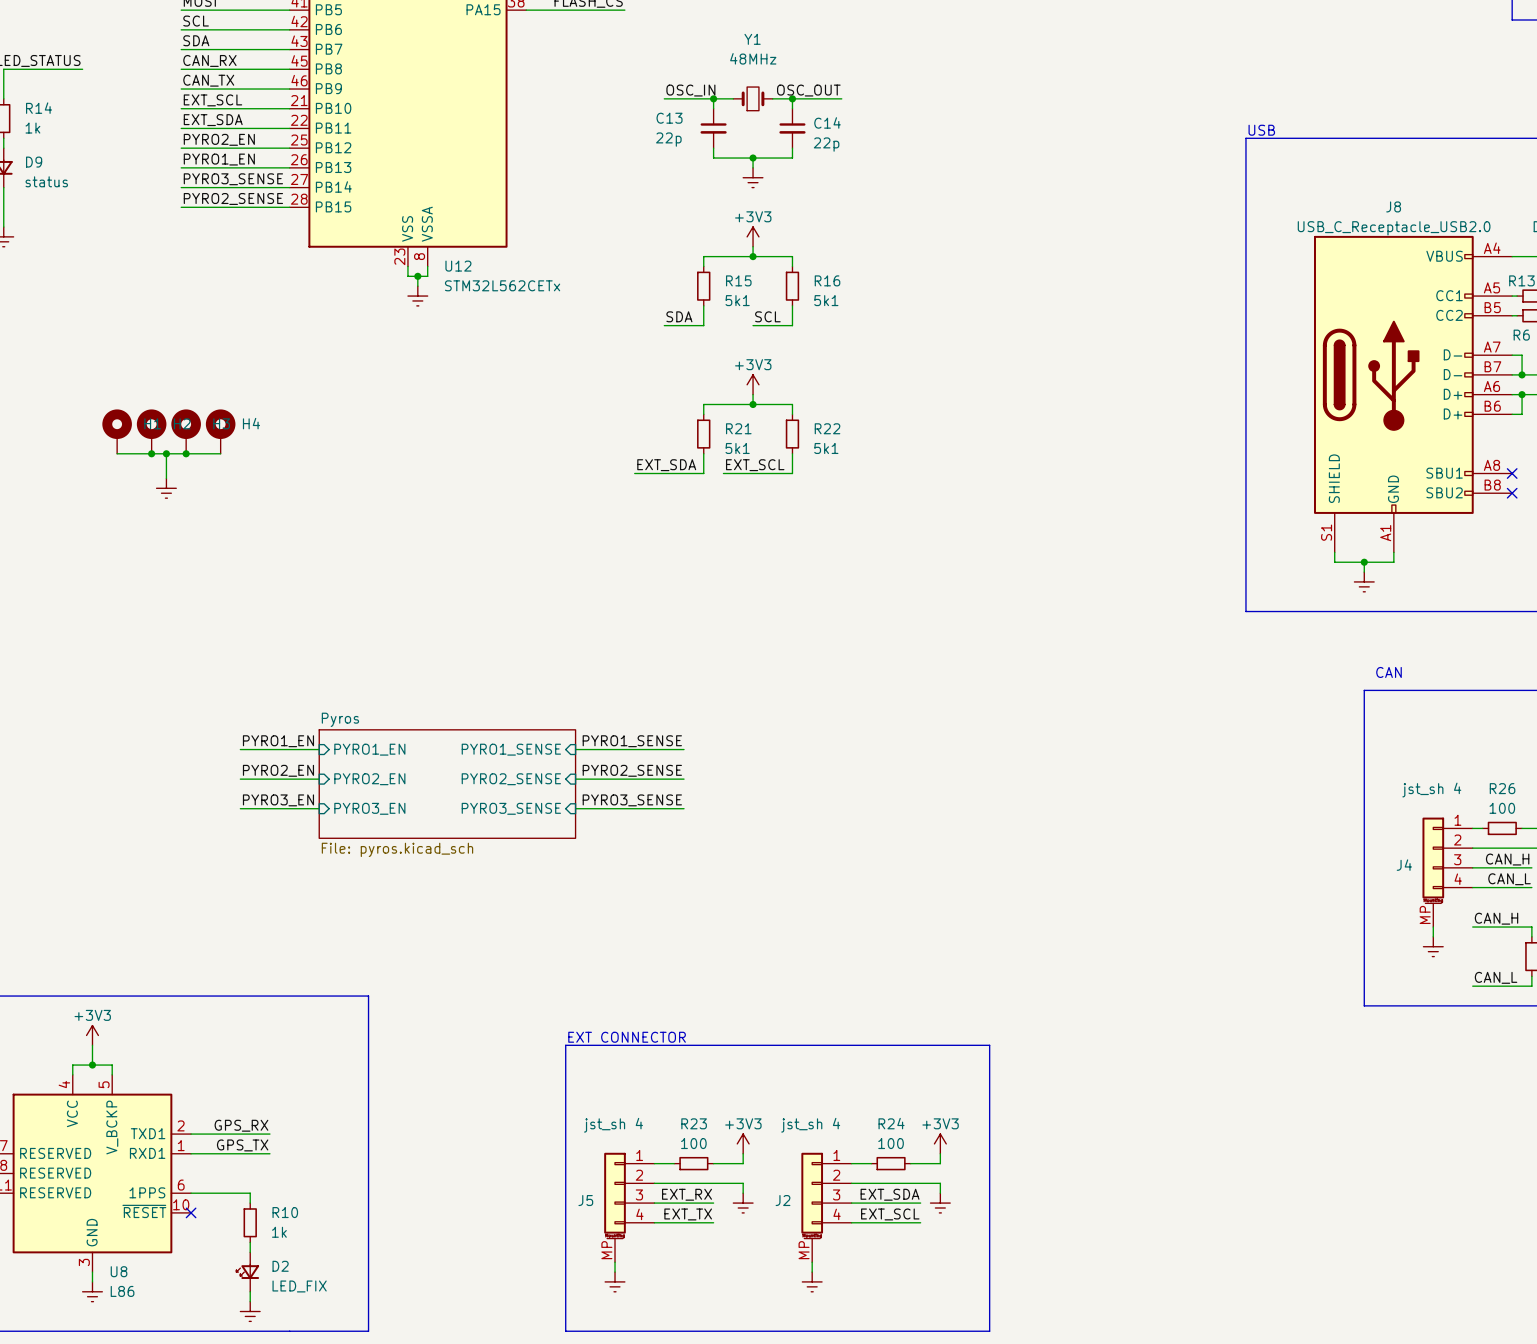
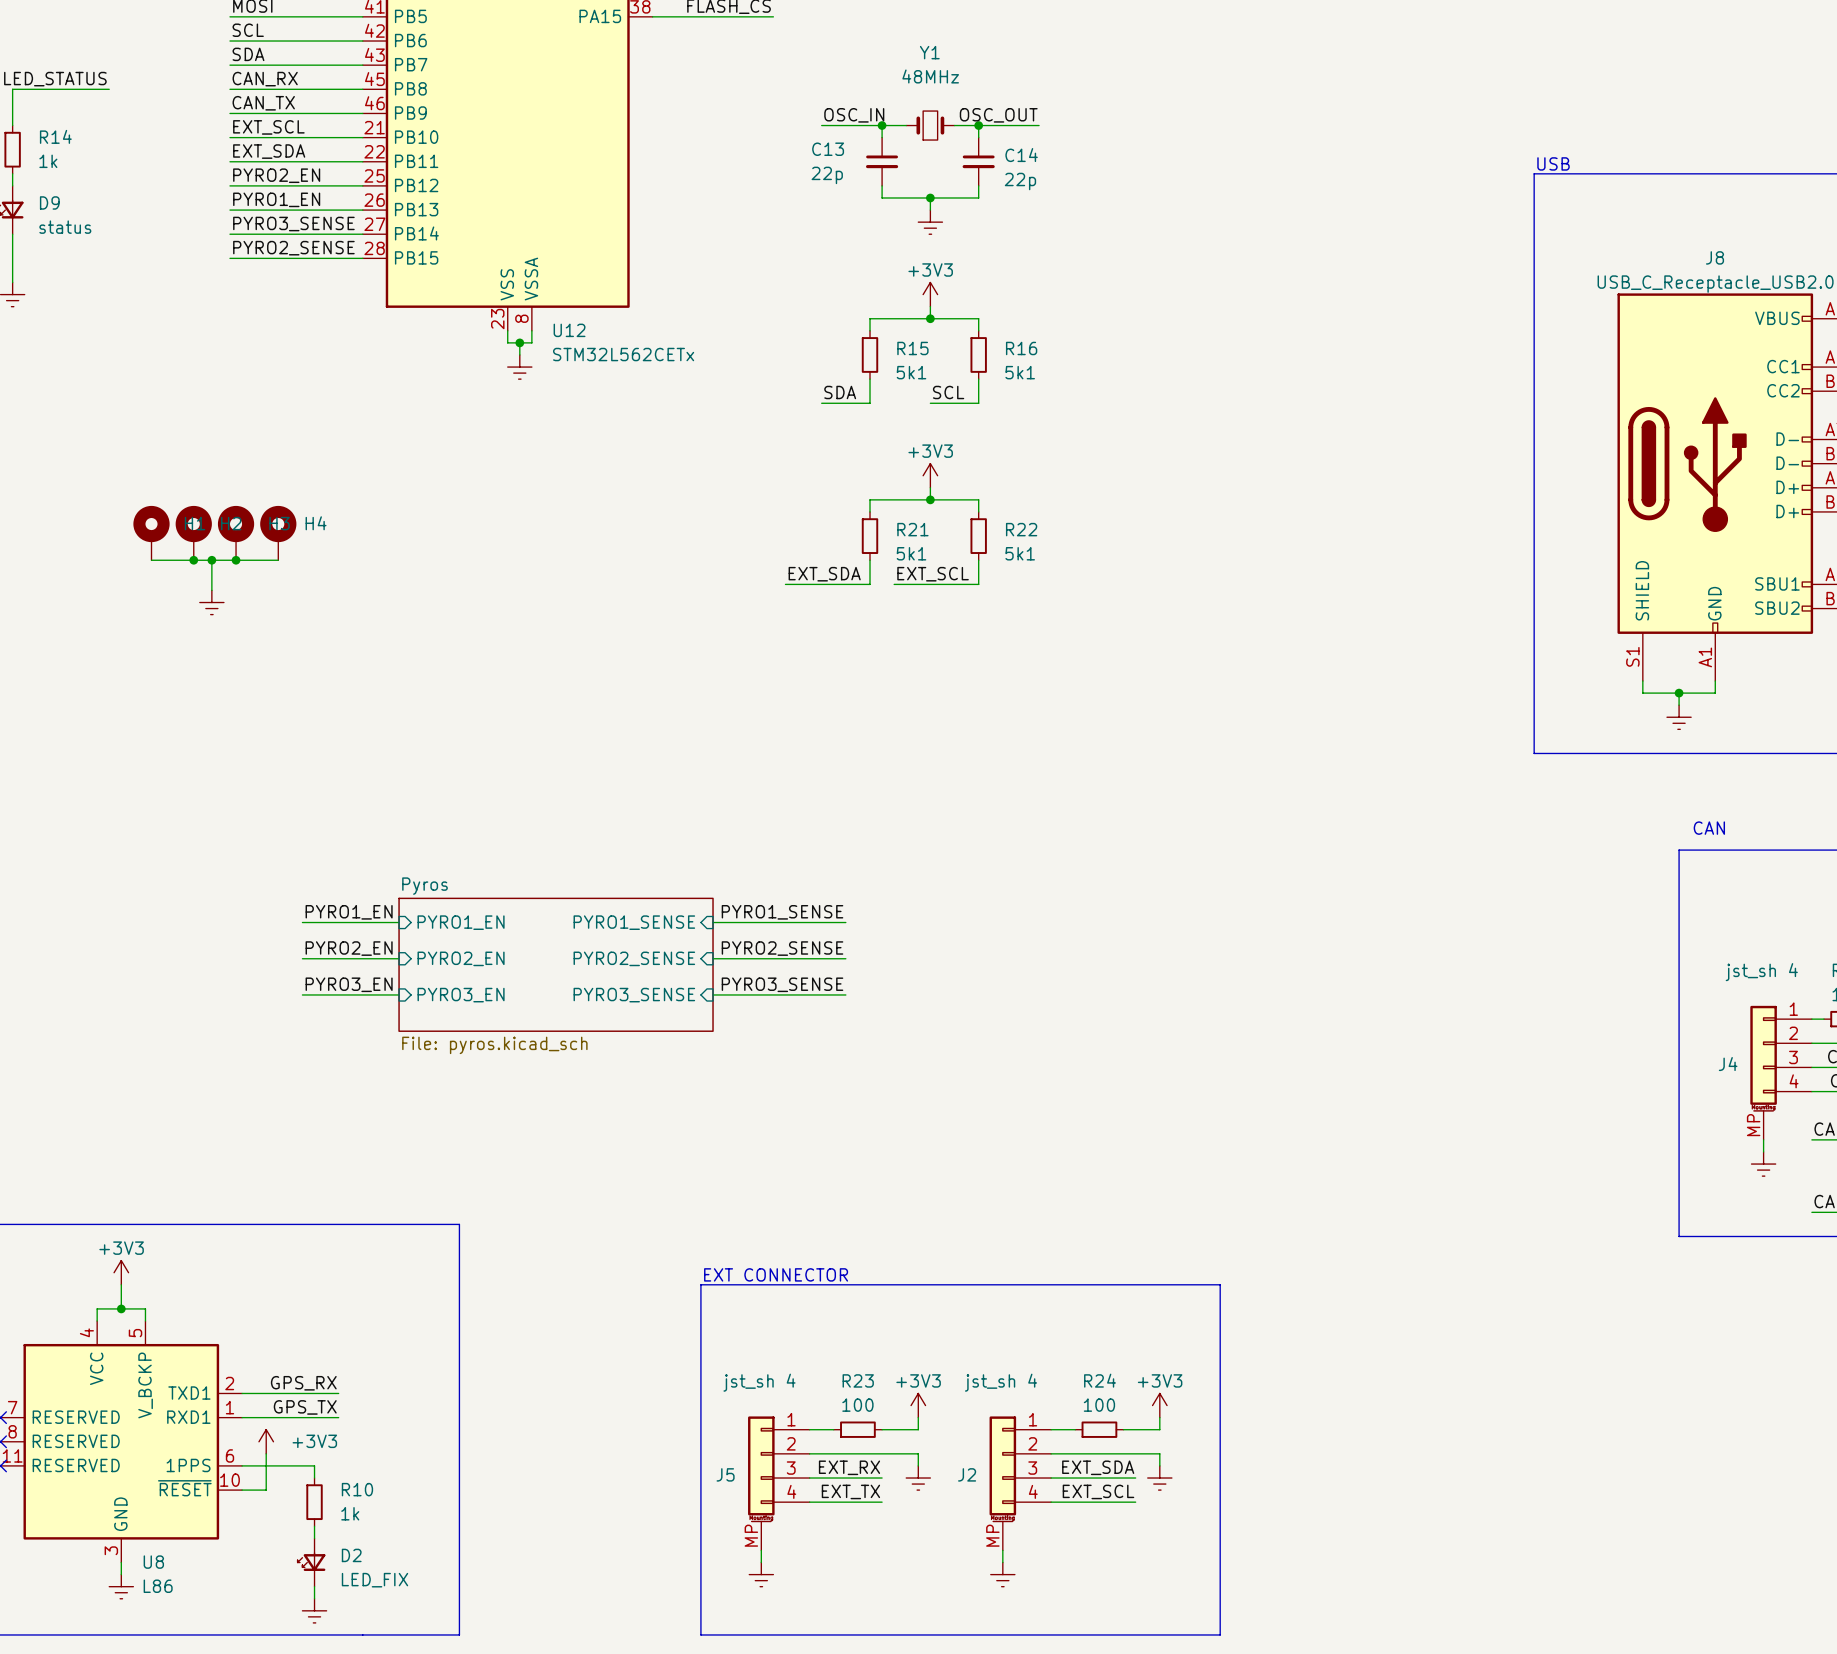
power symbol: none -> +3V3 (266, 1441)
wire: none -> (266, 1453) (266, 1490) (242, 1490)
no-connect mark: (191, 1212) -> none

